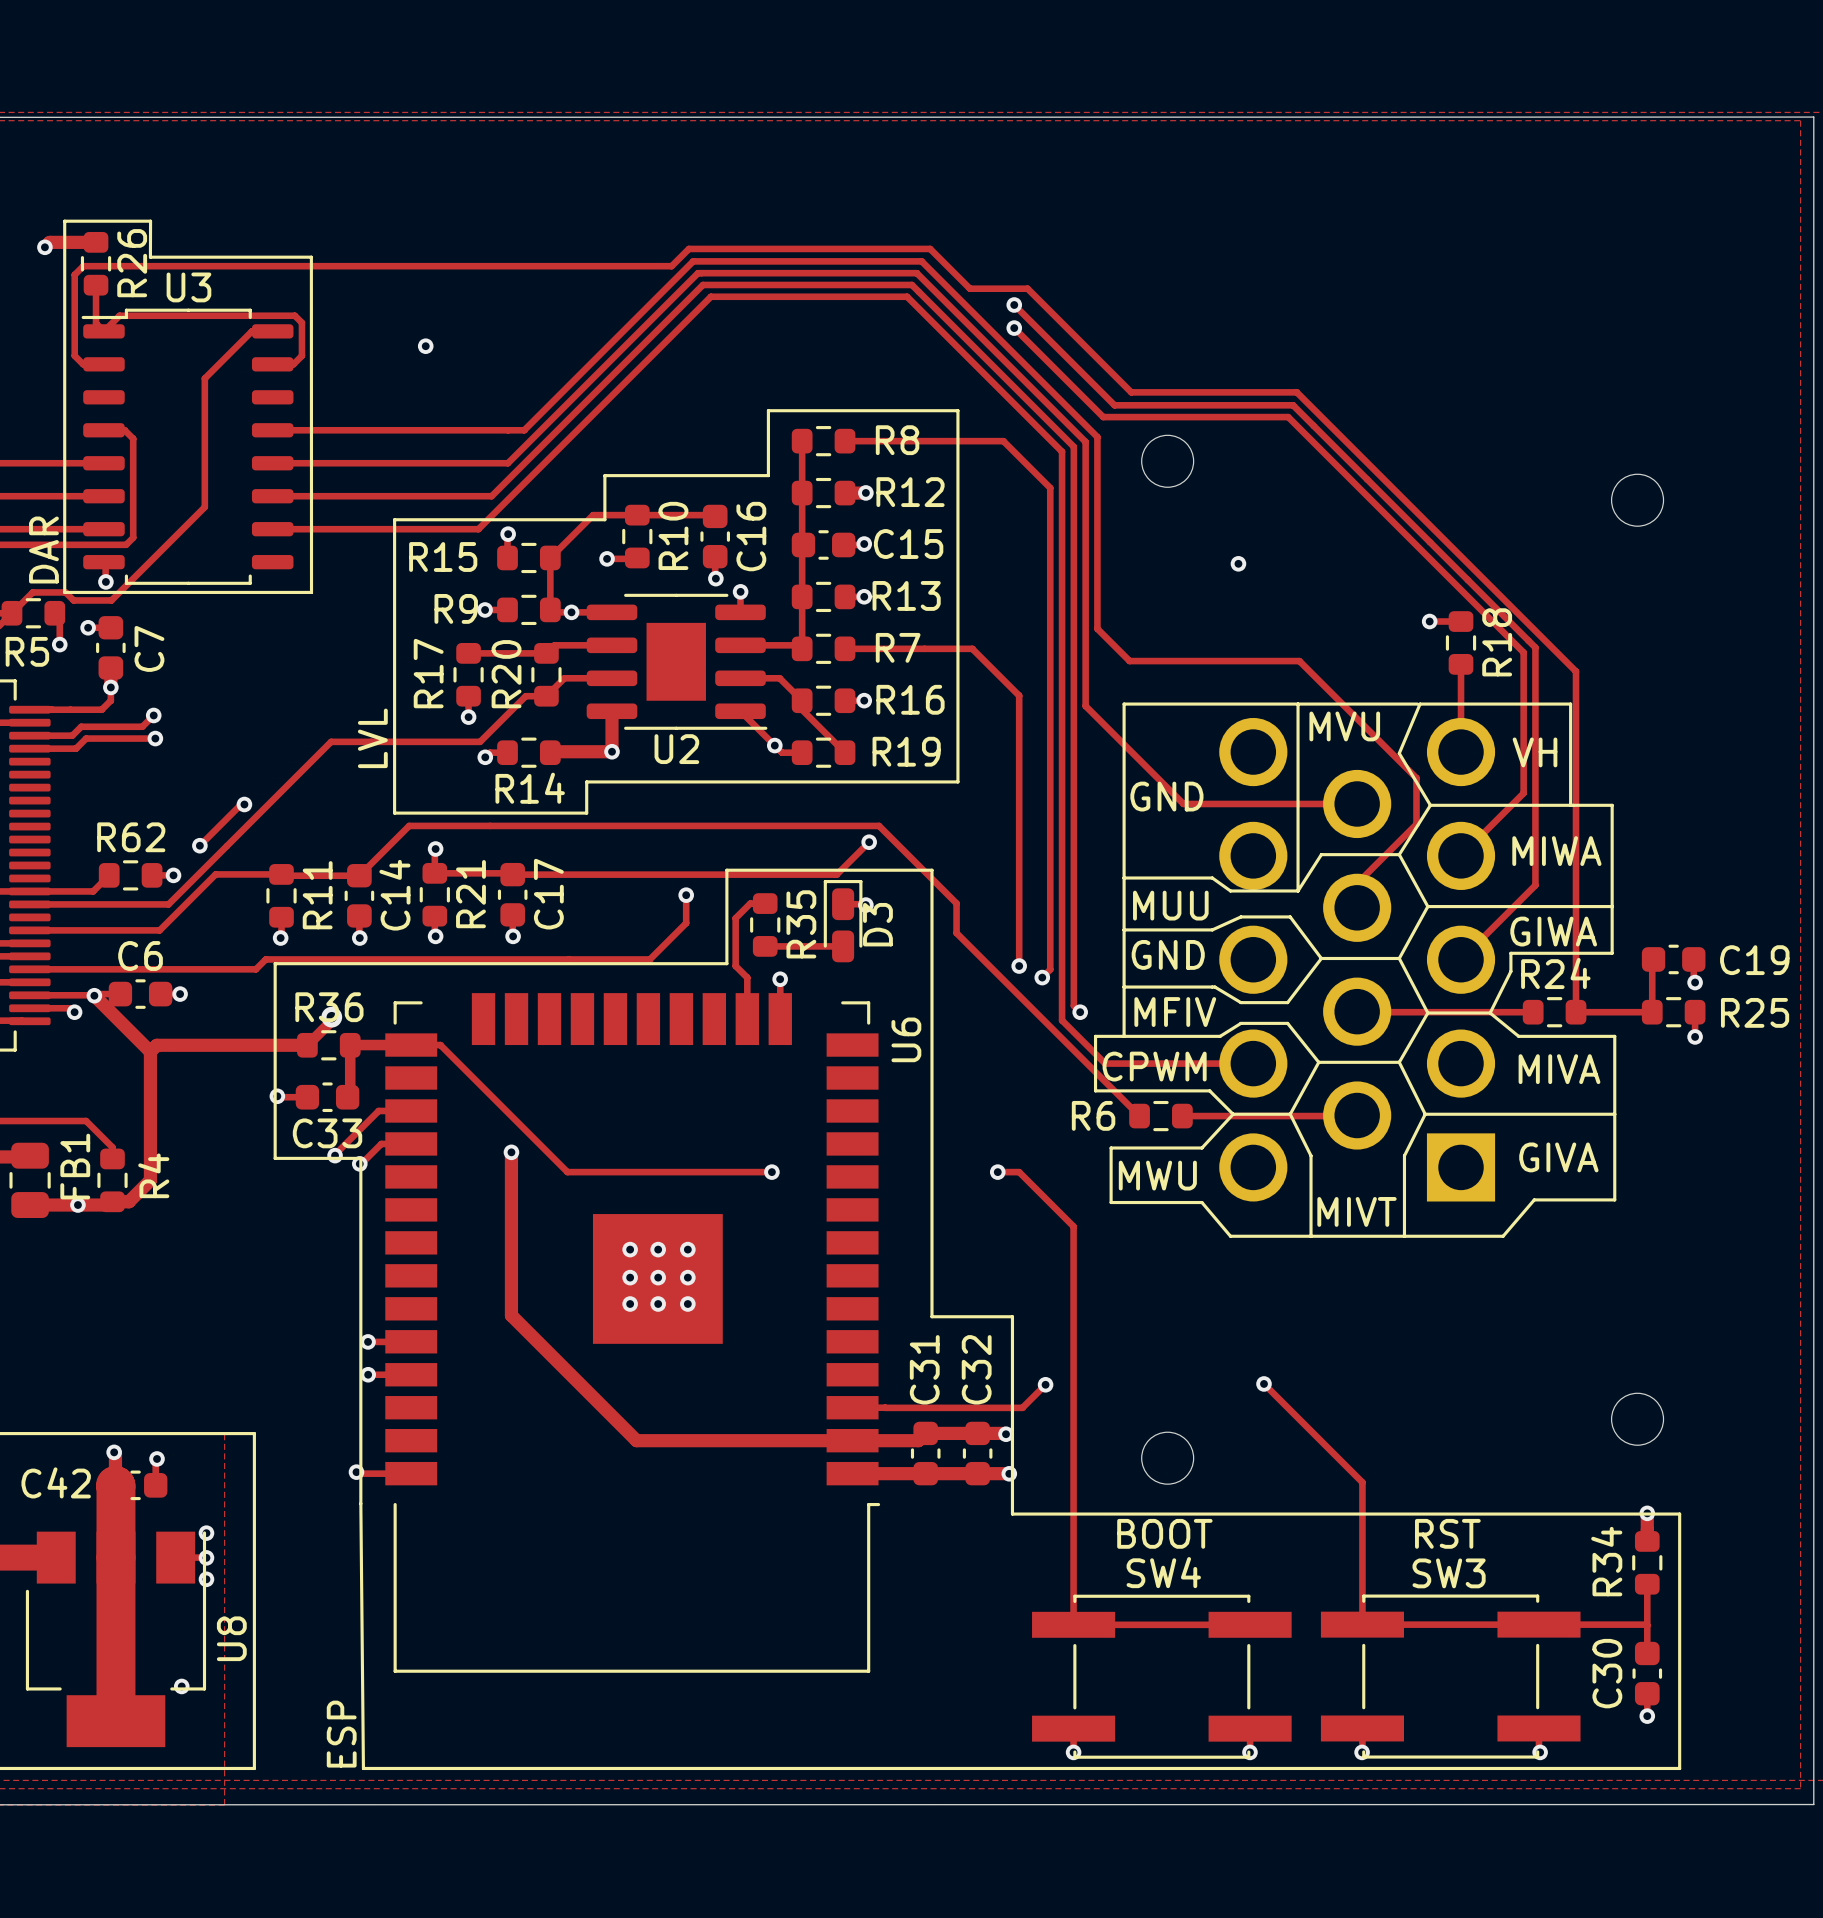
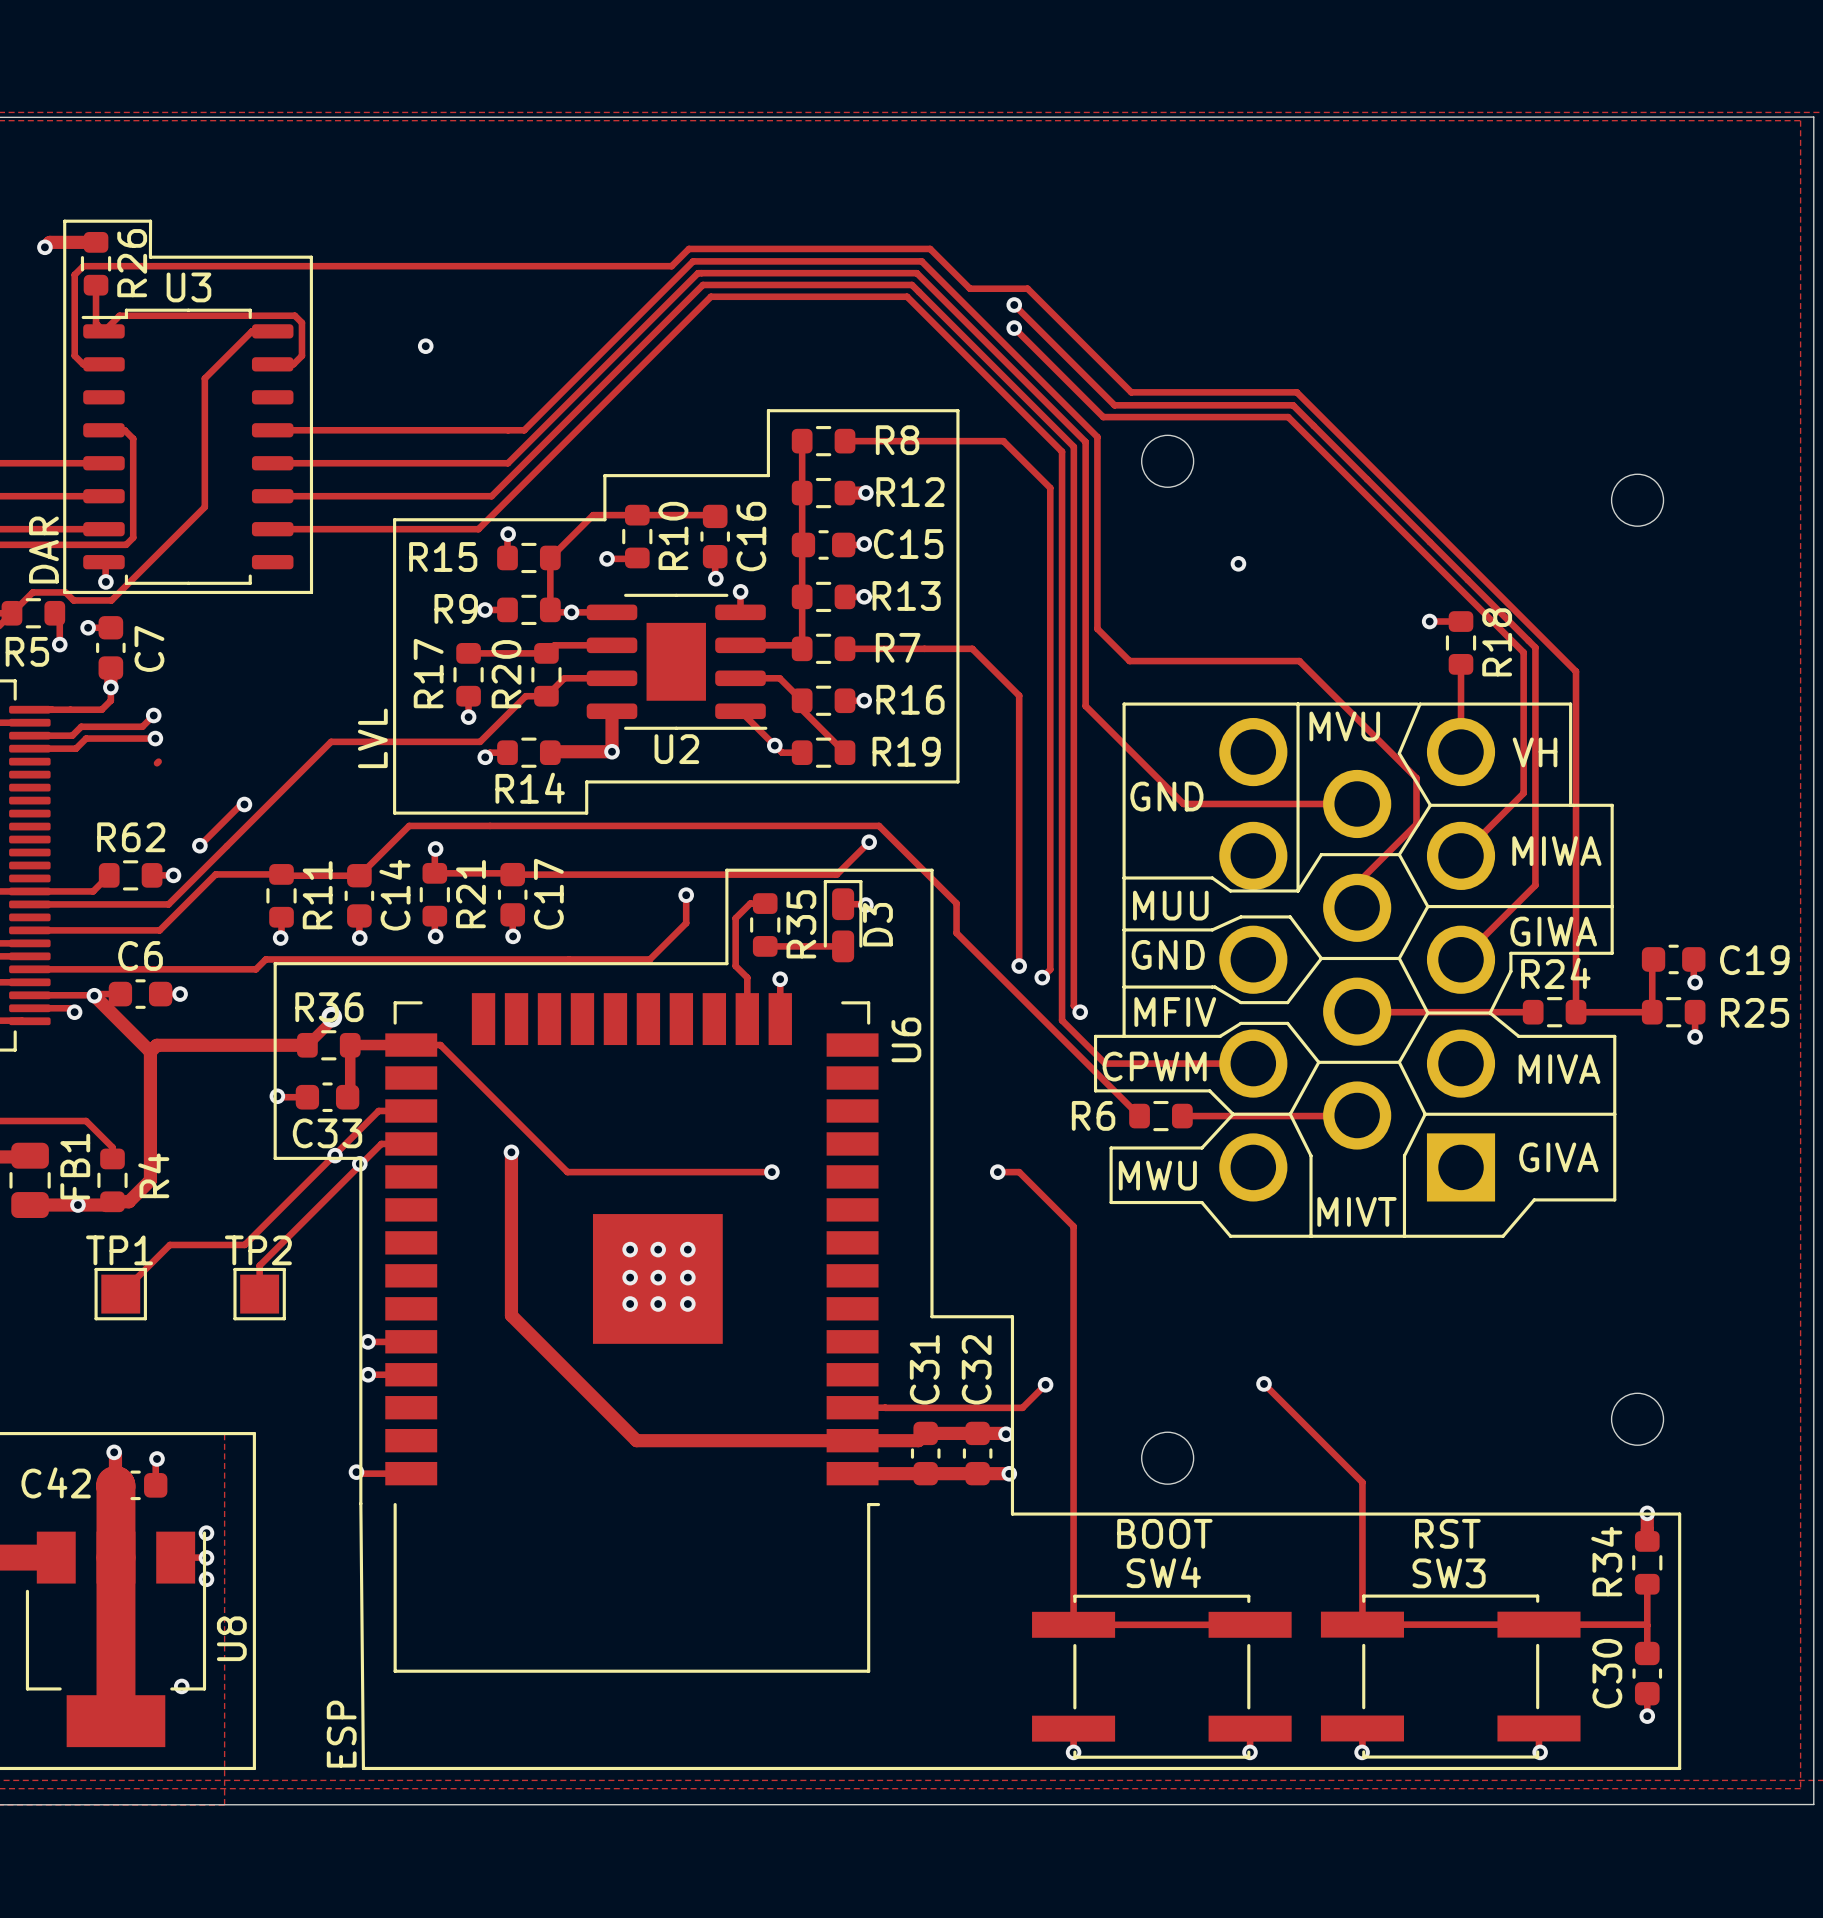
track: none -> (158, 761) (157, 763)
track: none -> (334, 1155) (244, 1244) (169, 1244) (120, 1294)
track: none -> (360, 1164) (259, 1265) (259, 1294)
TP1: none -> (120, 1294)
TP2: none -> (259, 1294)

